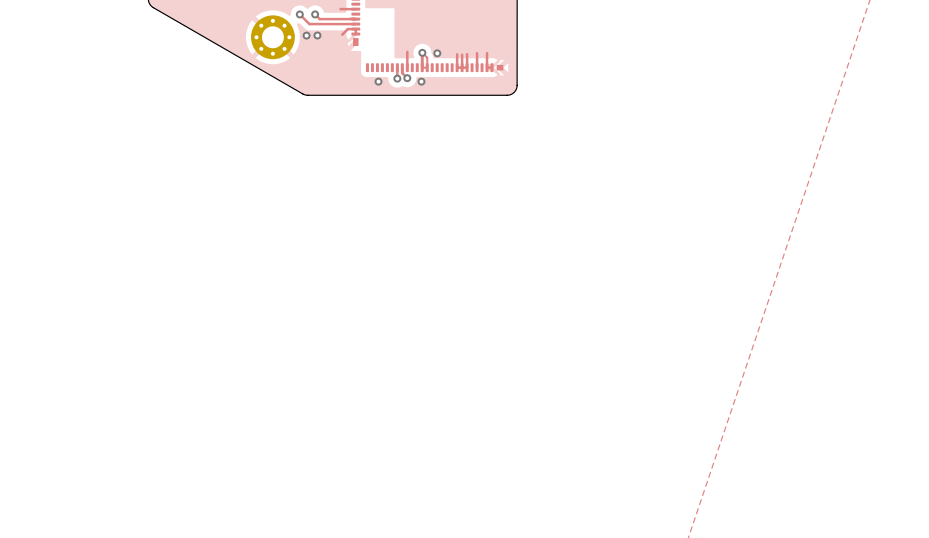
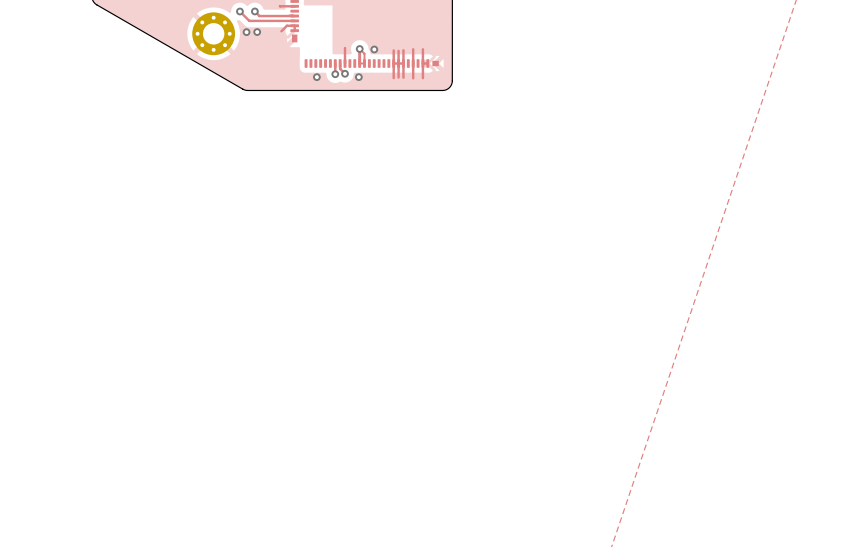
track: none -> (393, 63) (393, 78)
track: none -> (398, 63) (398, 77)
track: none -> (403, 63) (403, 77)
track: none -> (413, 63) (413, 78)
track: none -> (422, 63) (422, 78)

